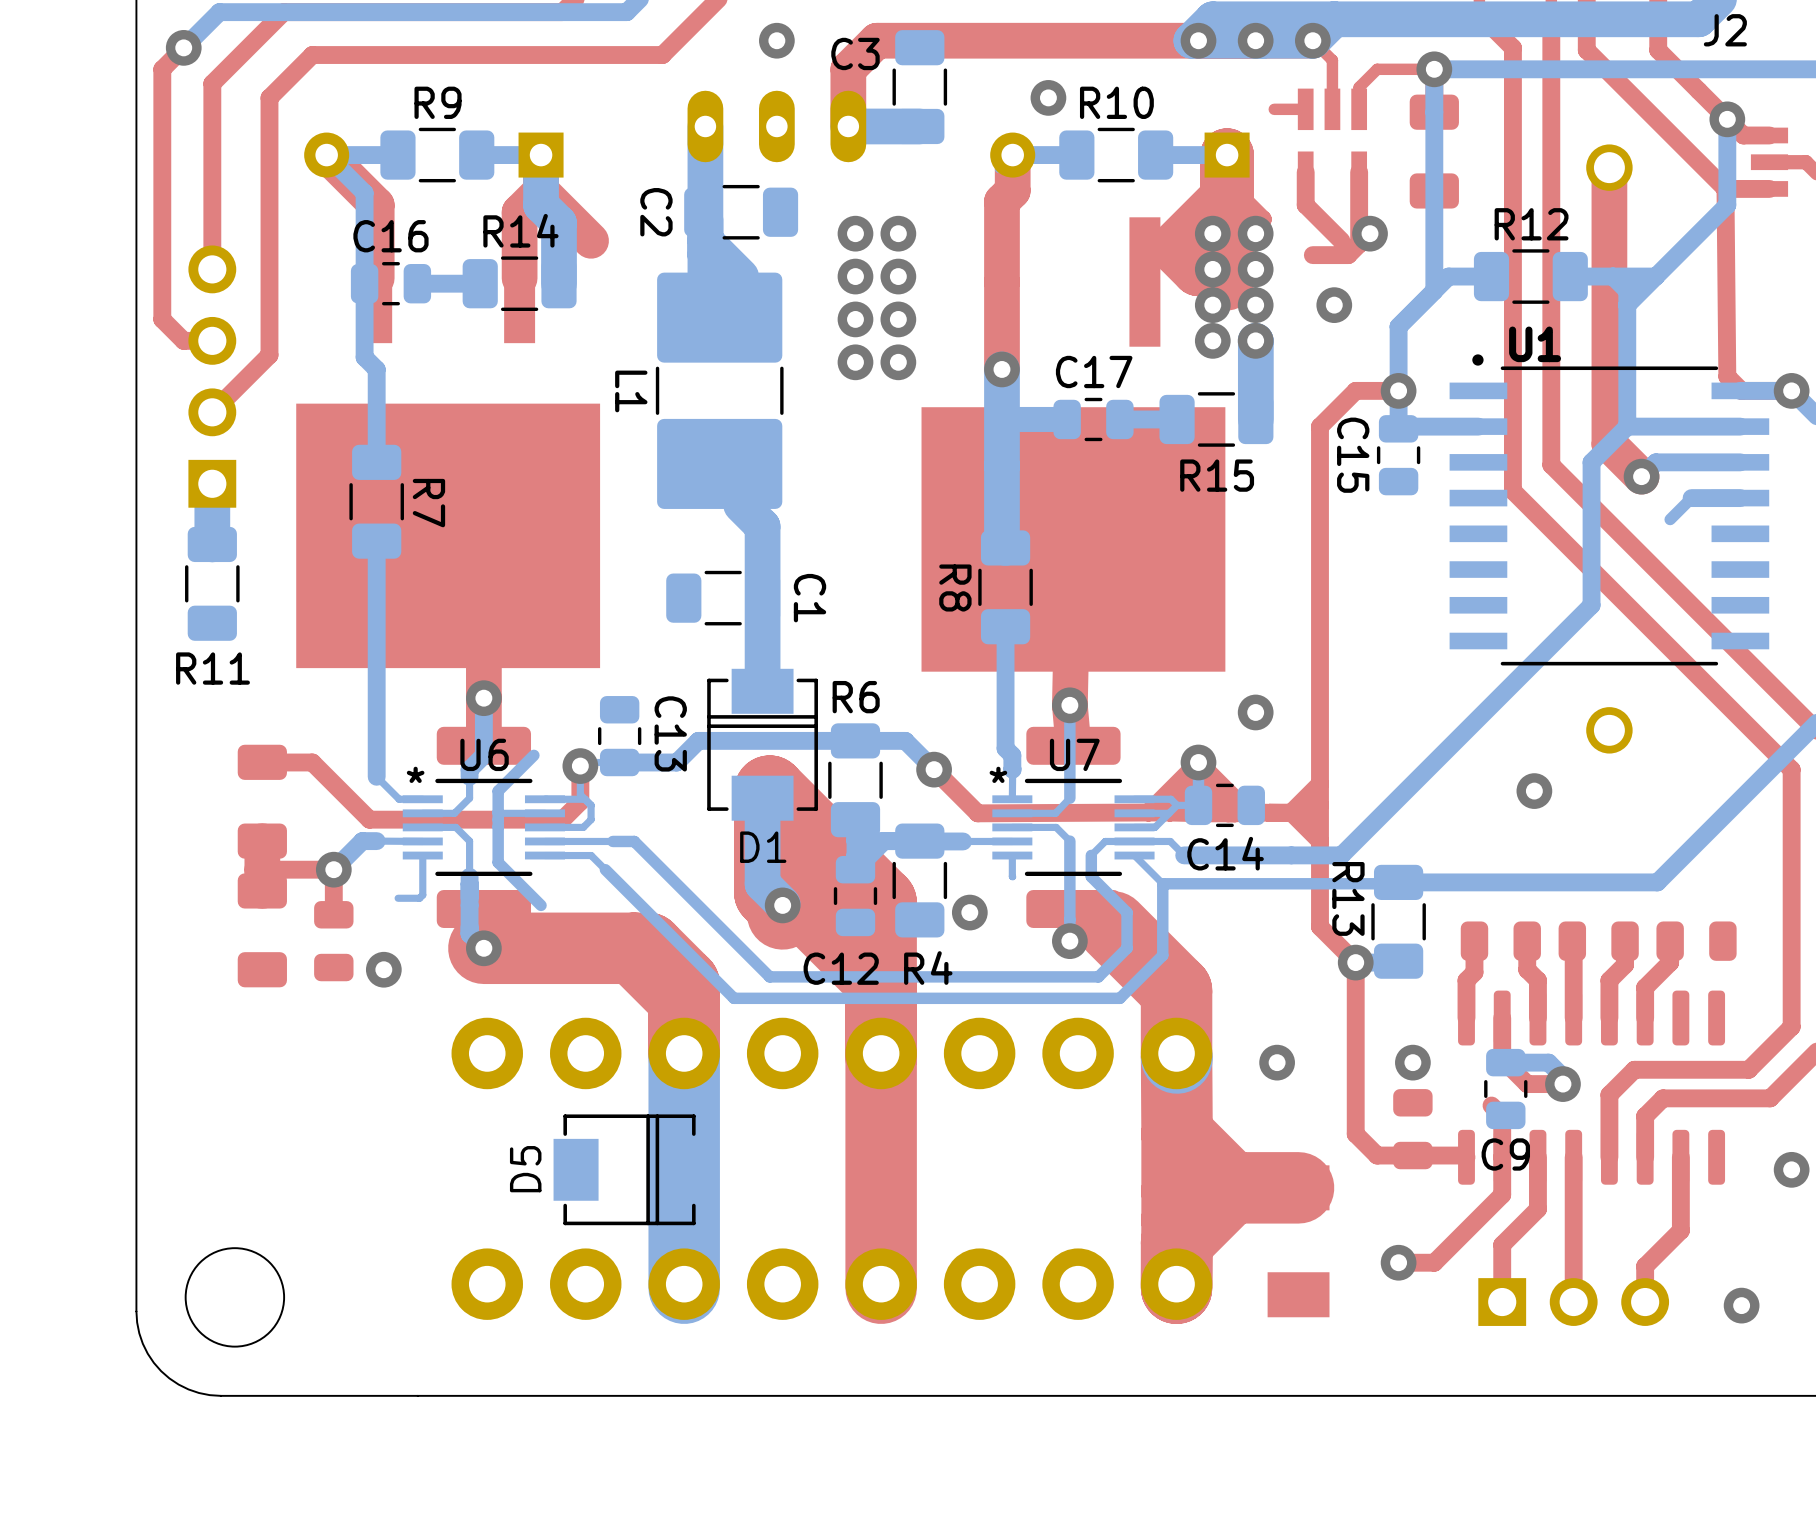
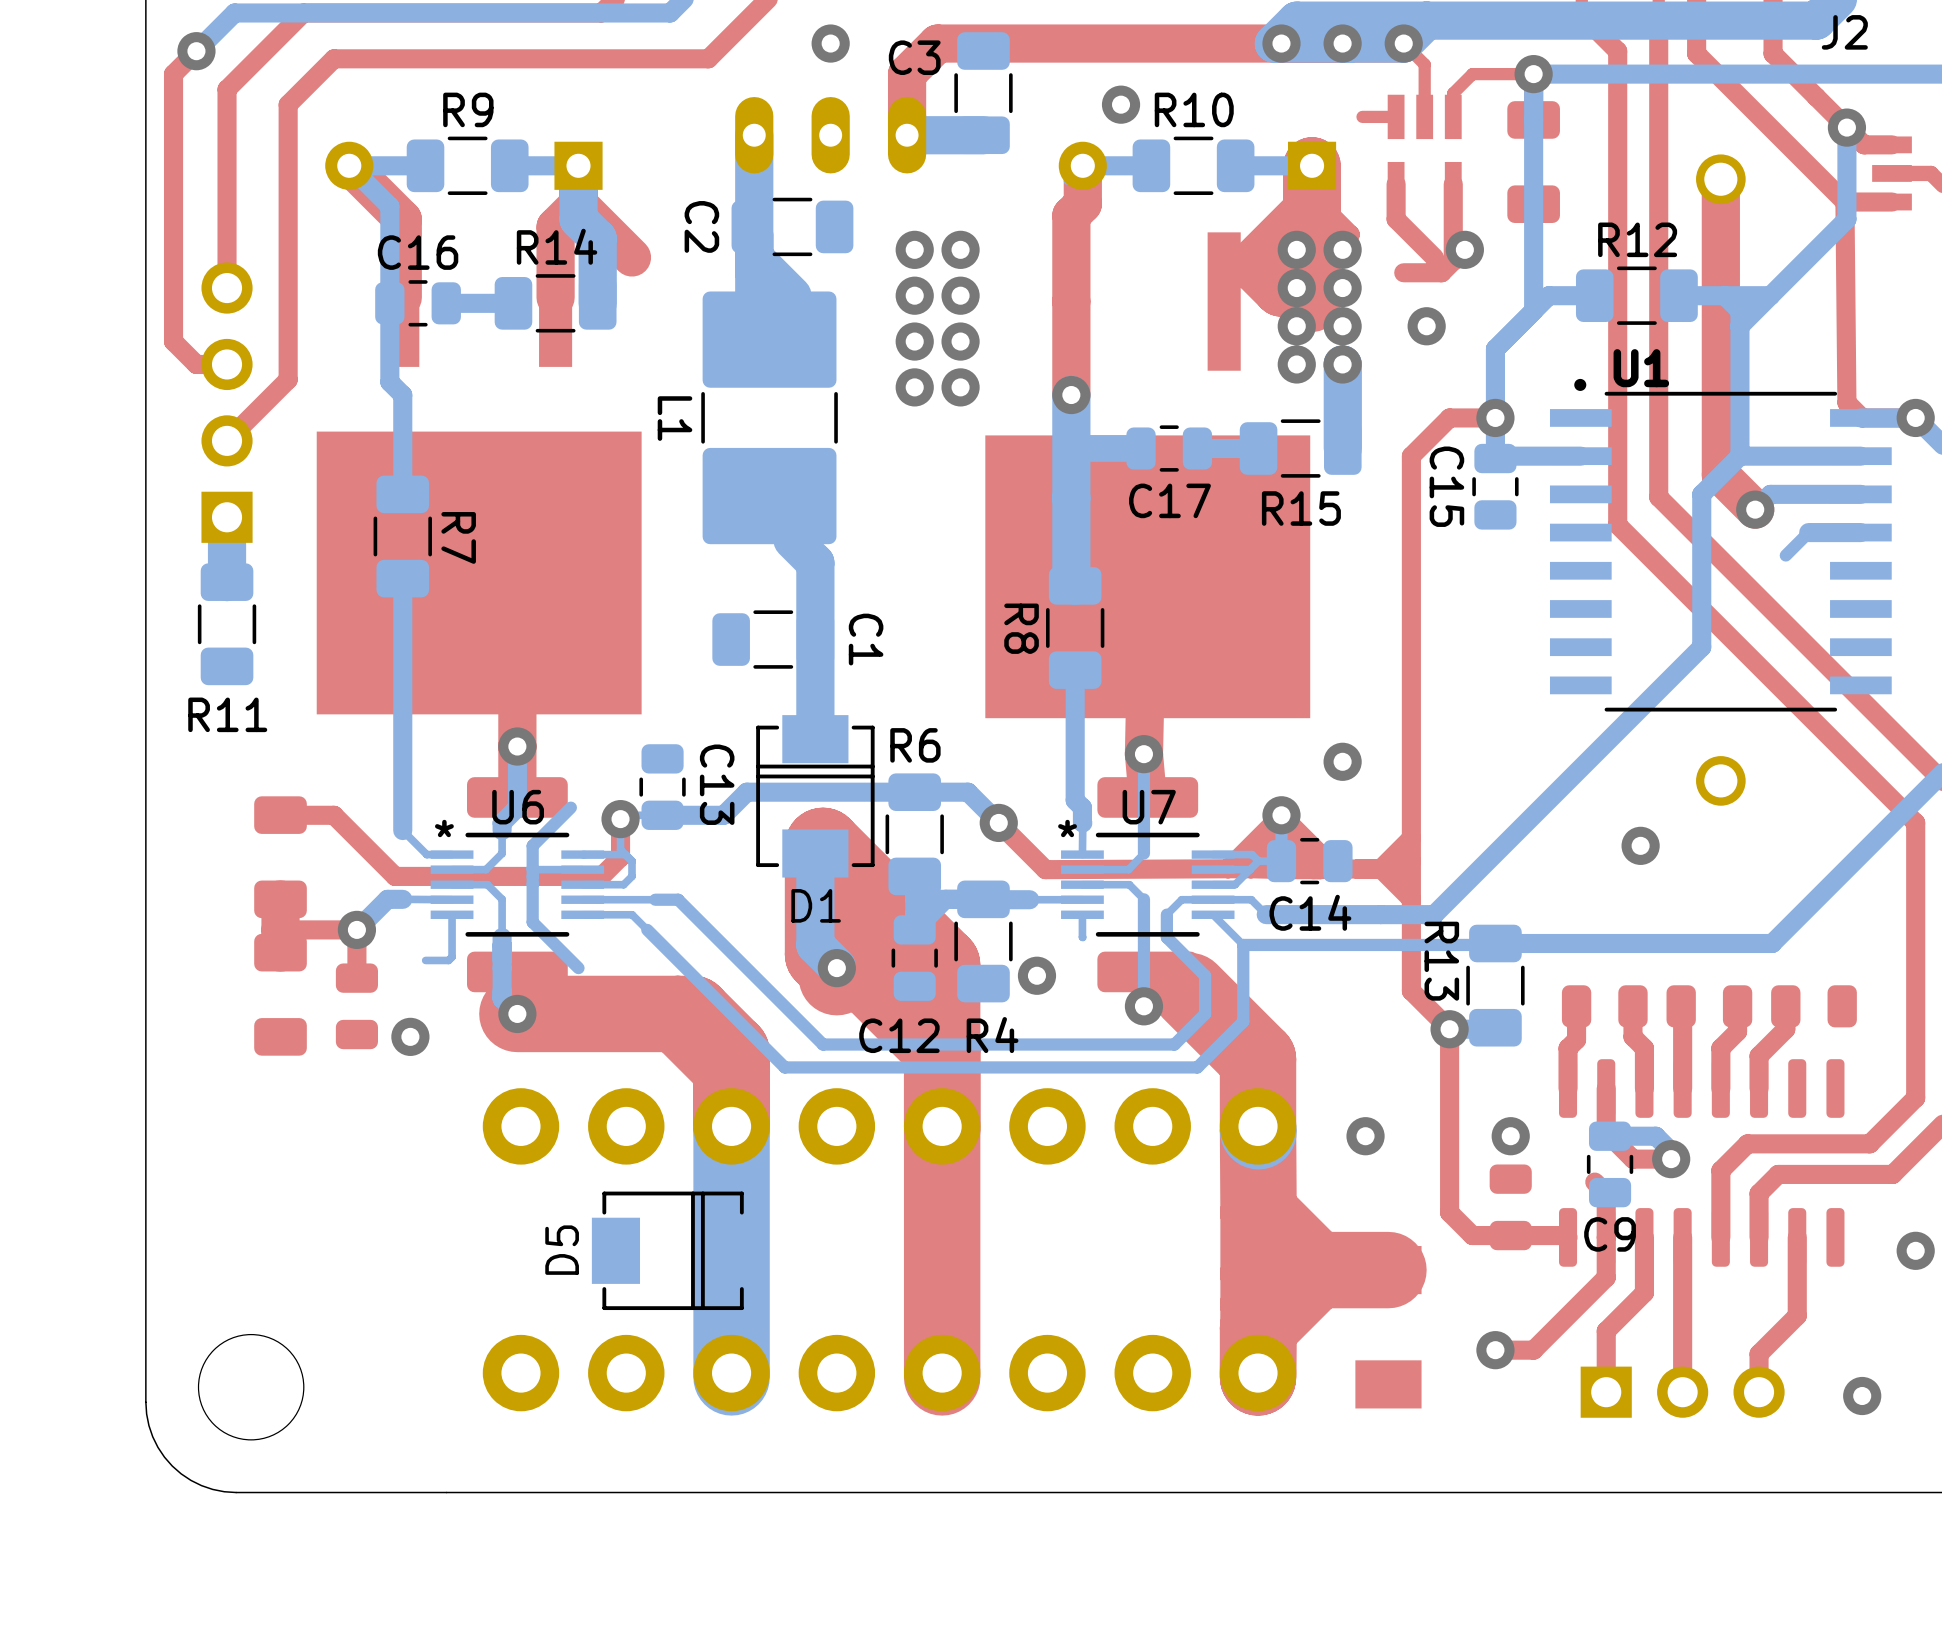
C17 name position: C17 (1094, 372) -> C17 (1169, 500)

